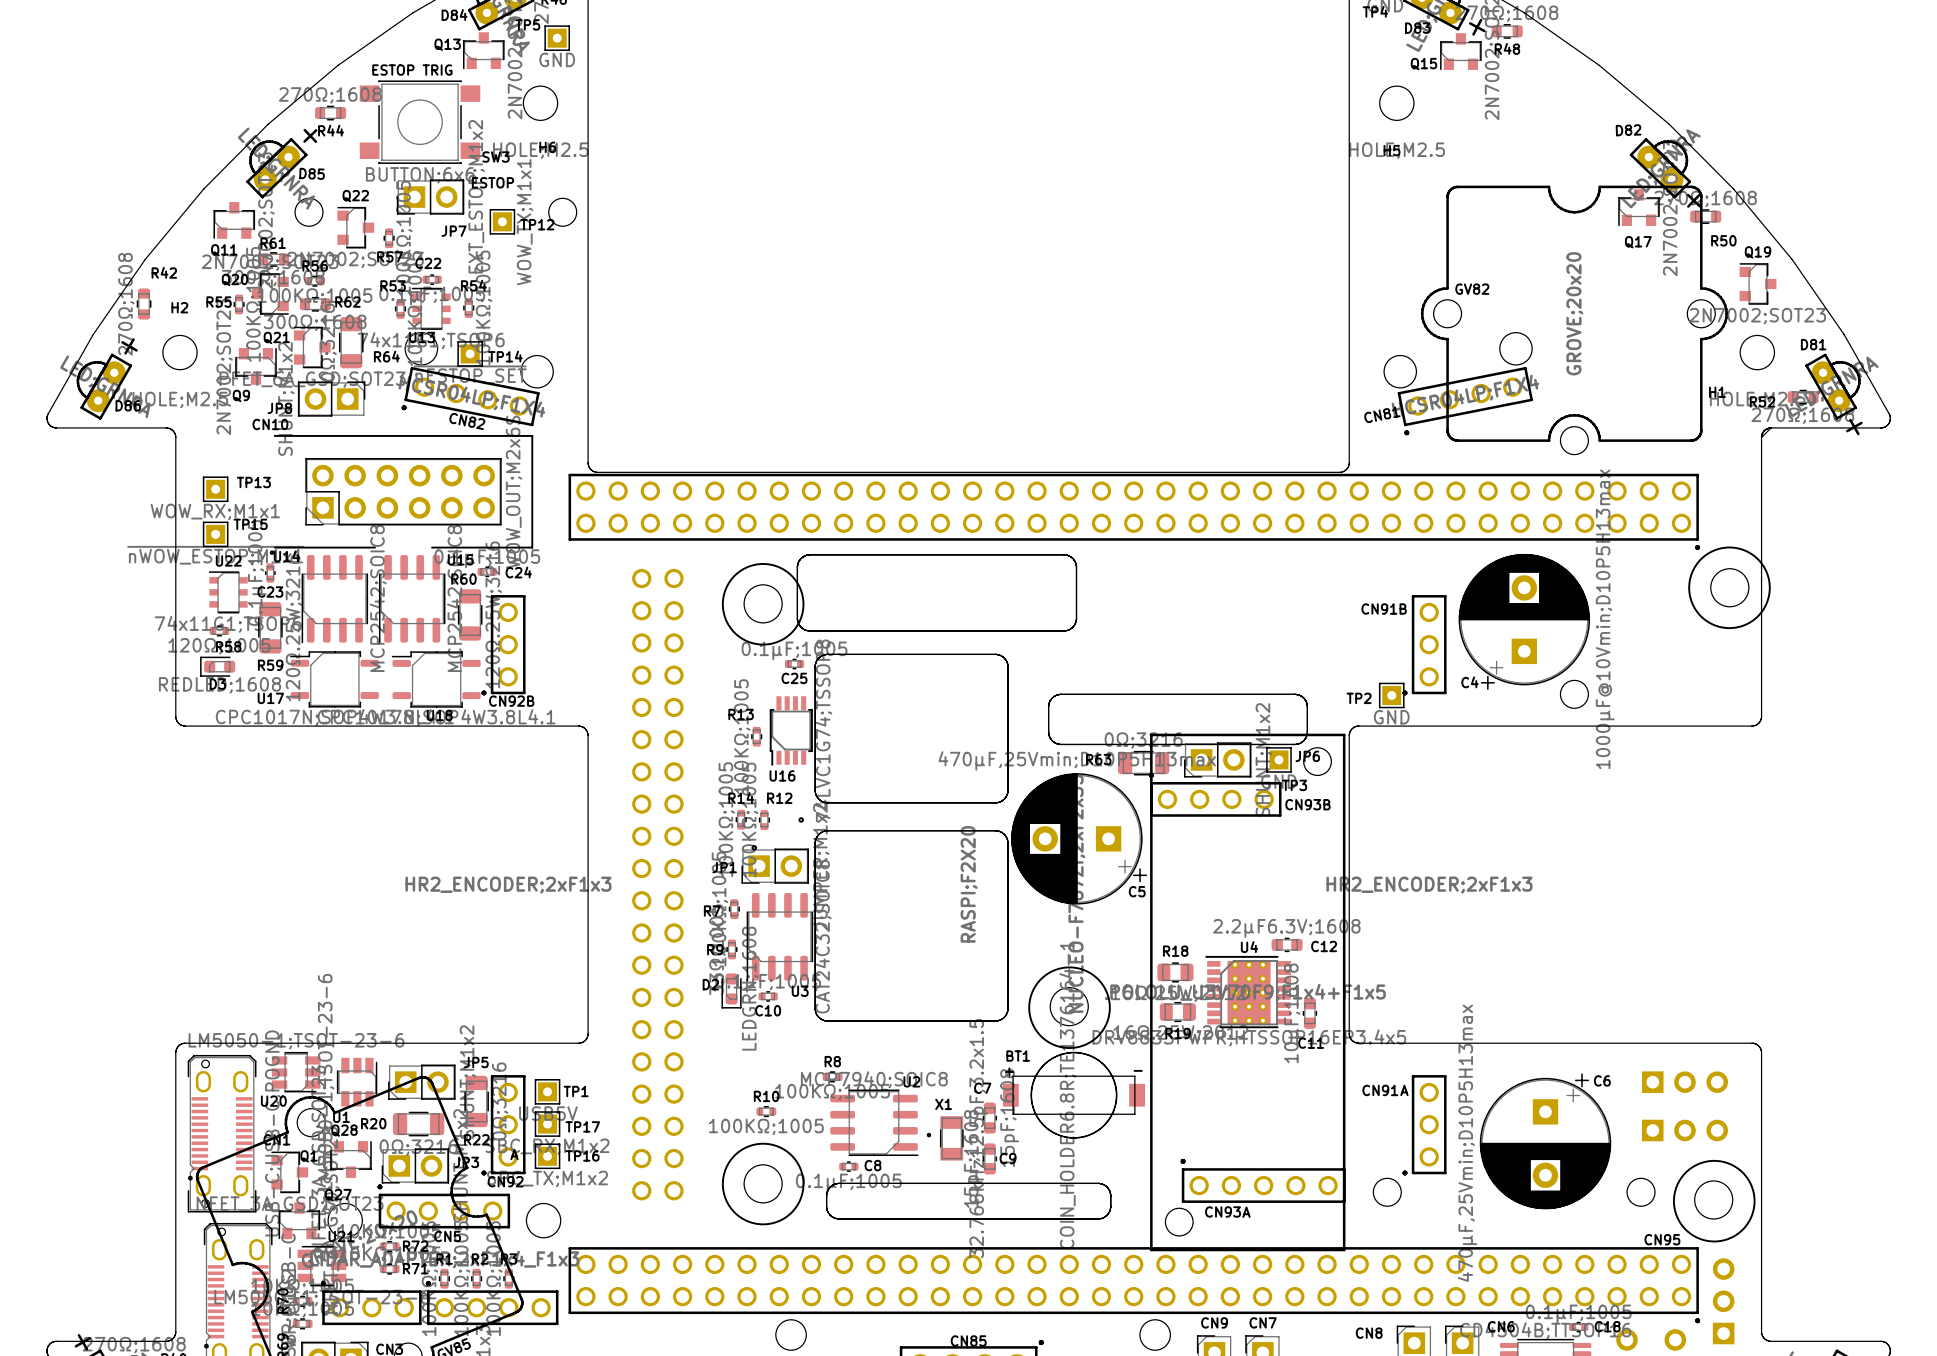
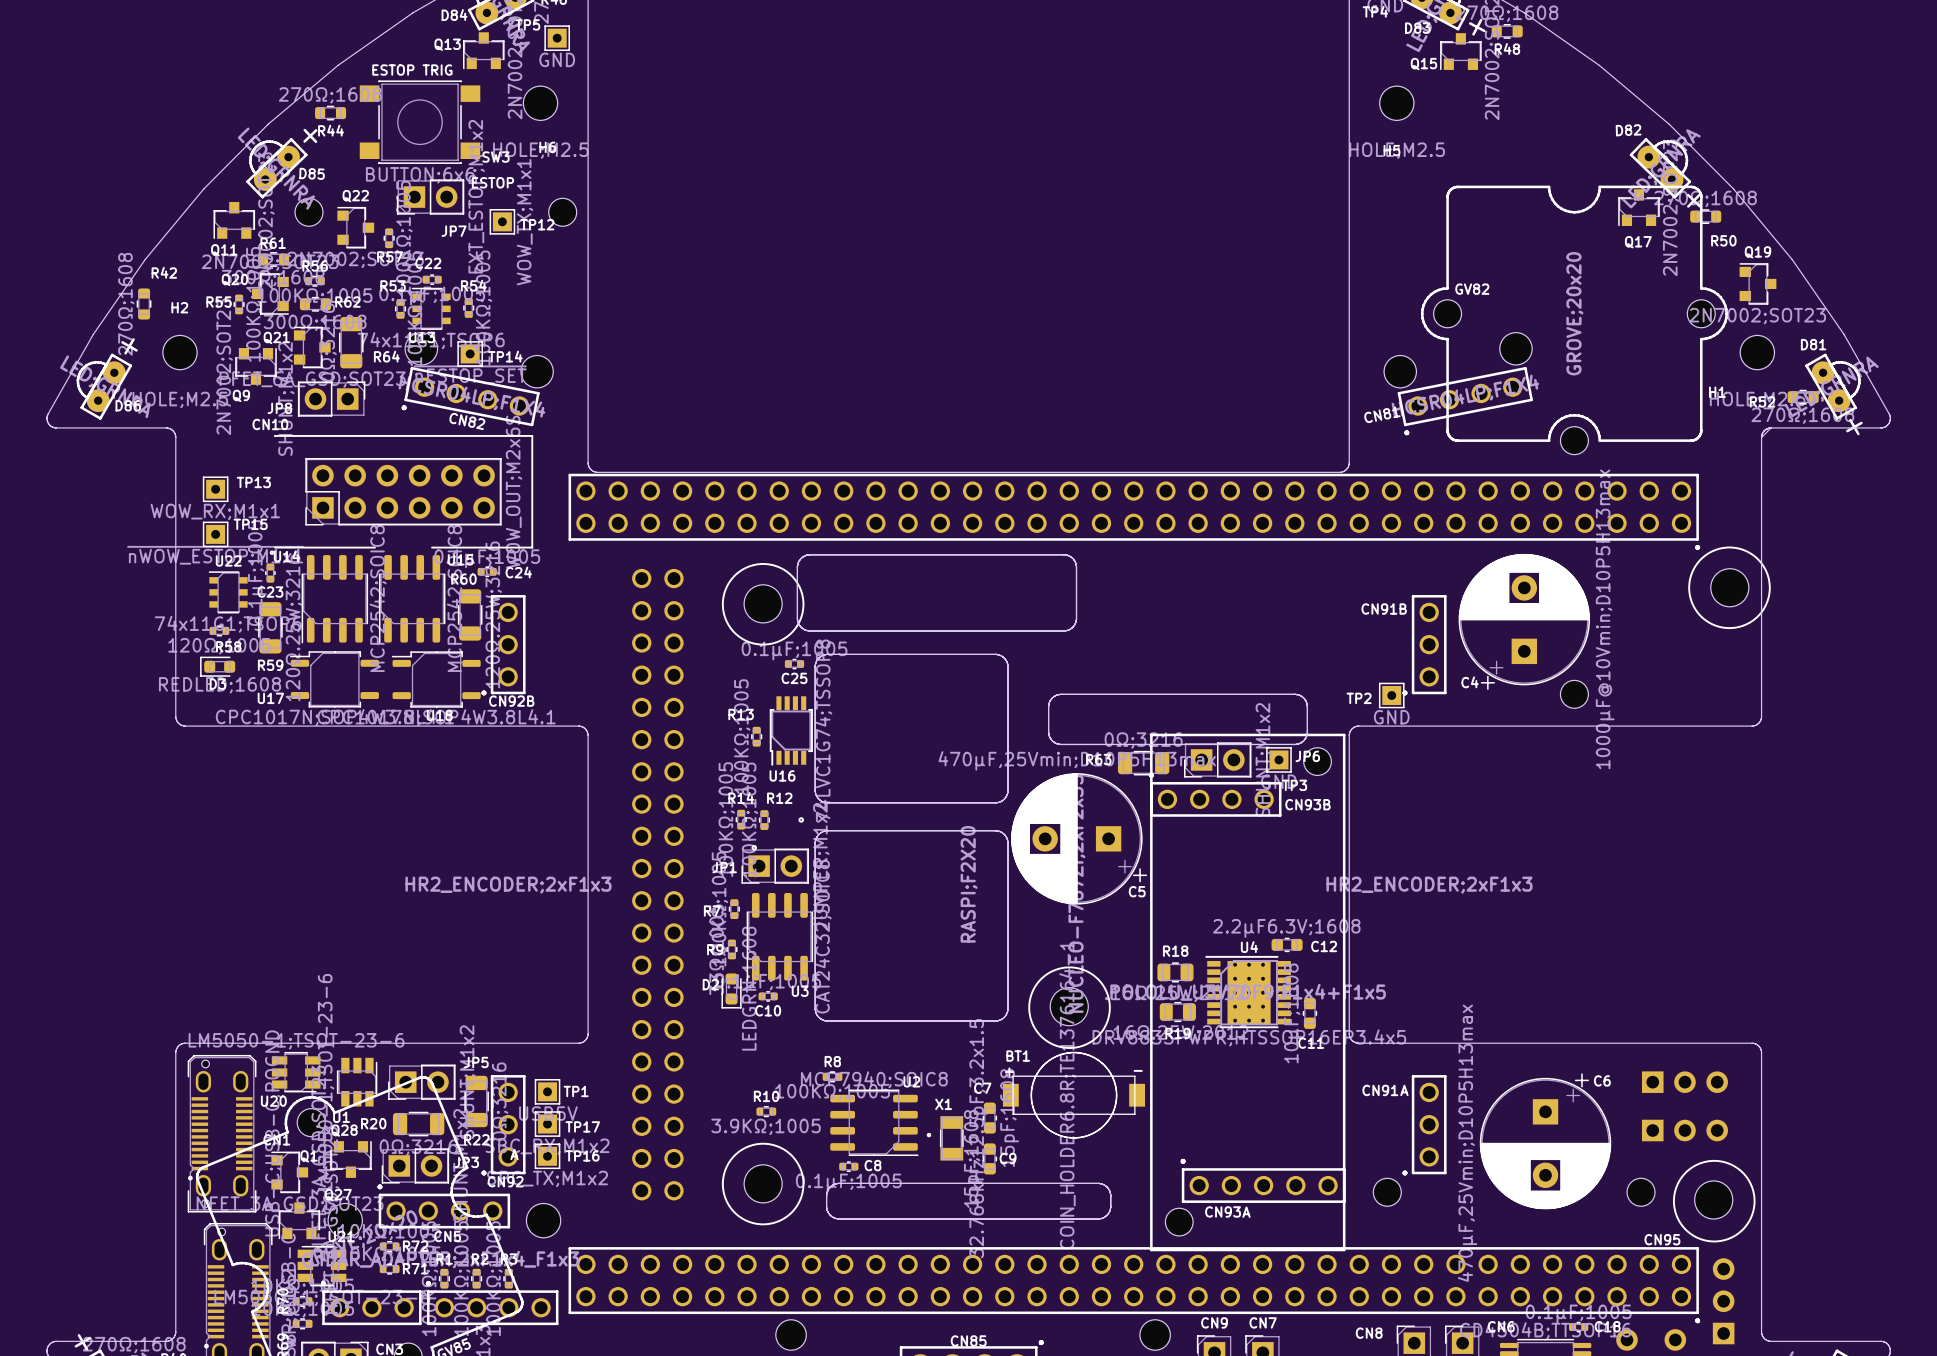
R10 value: 100KΩ;1005 (766, 1126) -> 3.9KΩ;1005 (766, 1126)

